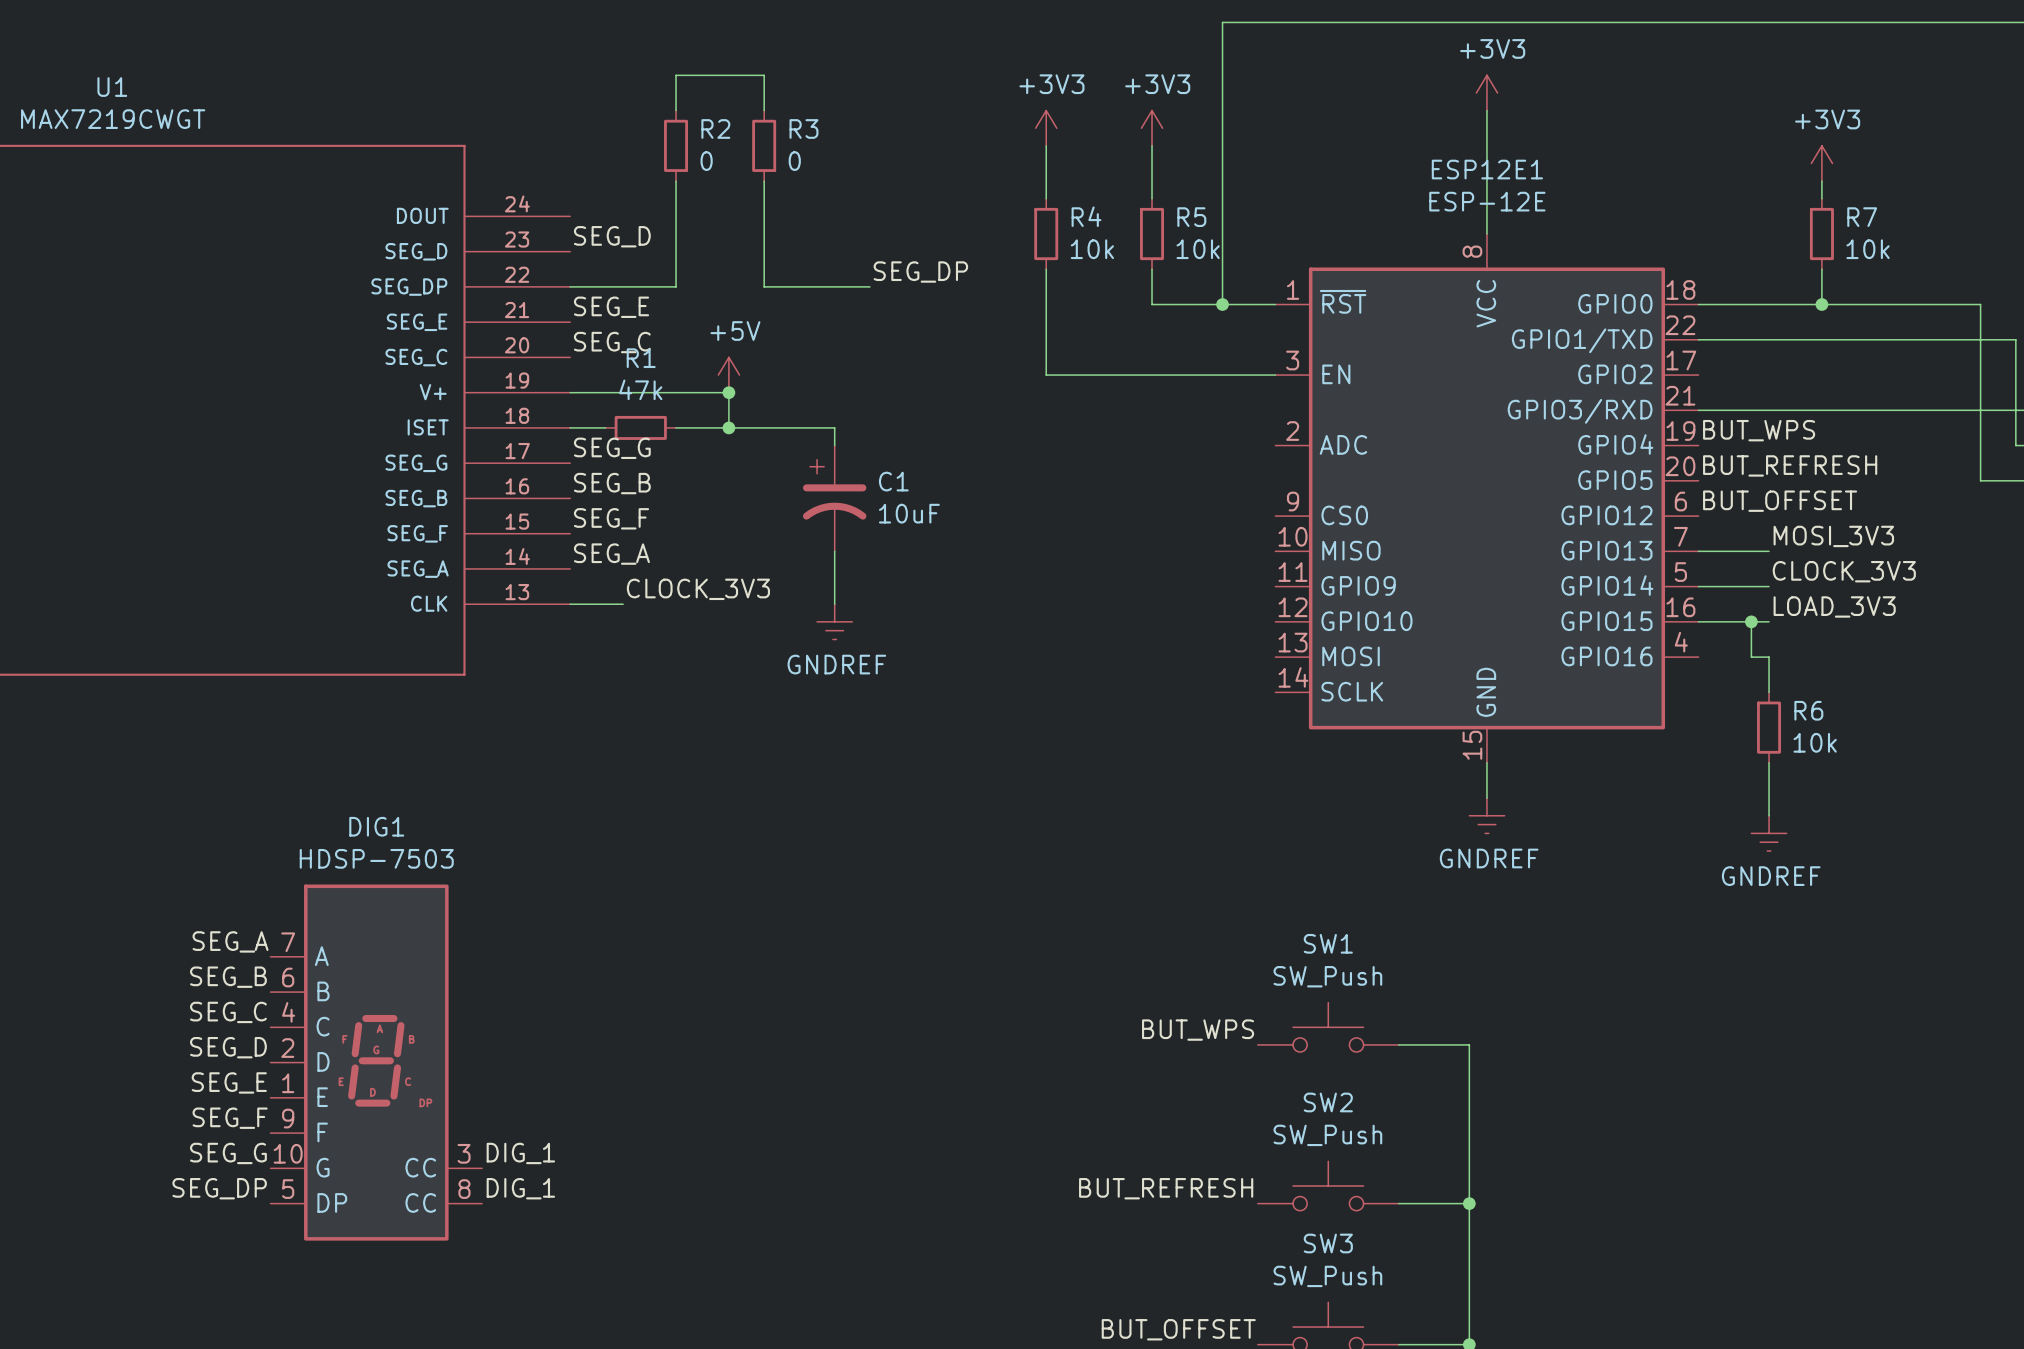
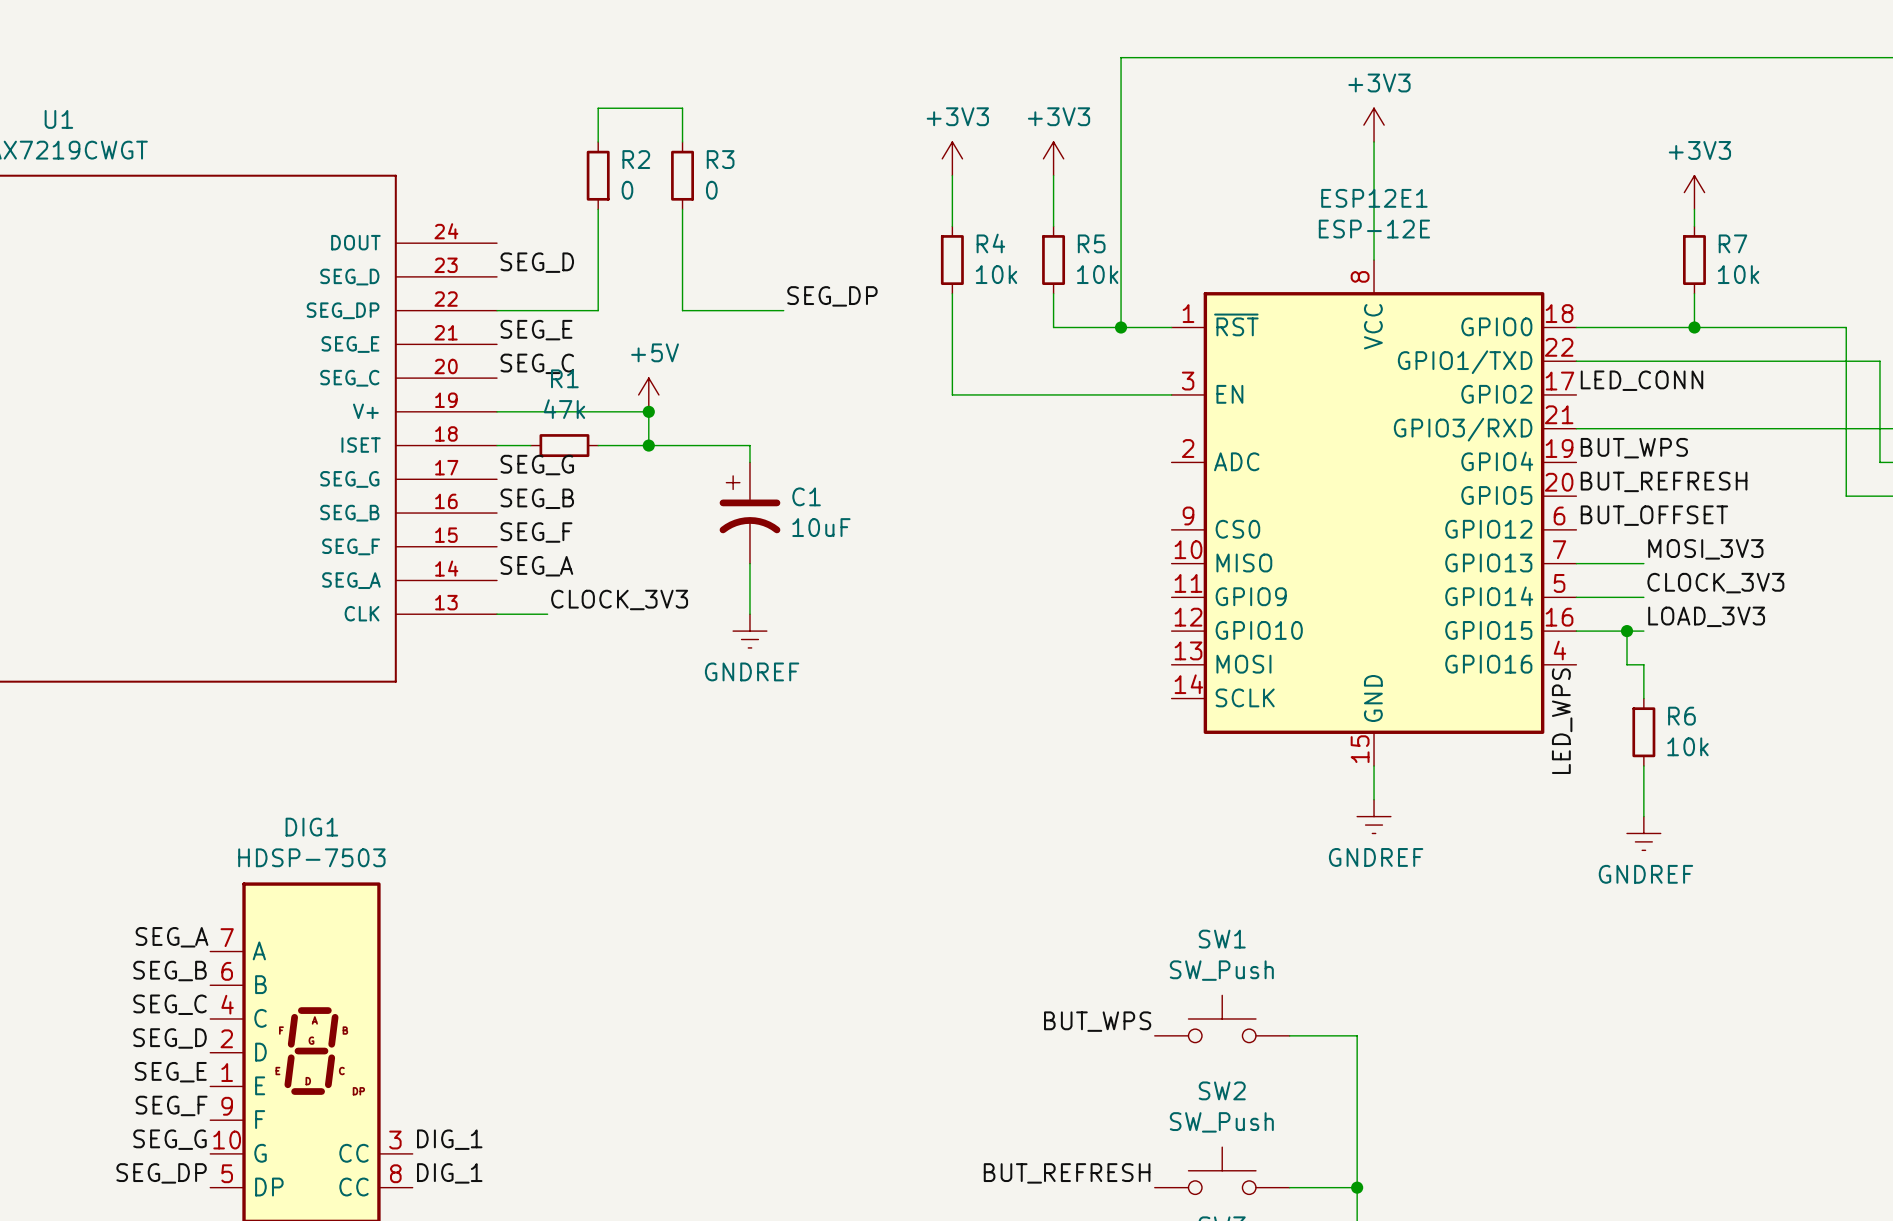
label: none -> LED_CONN (1641, 380)
label: none -> LED_WPS (1562, 721)

